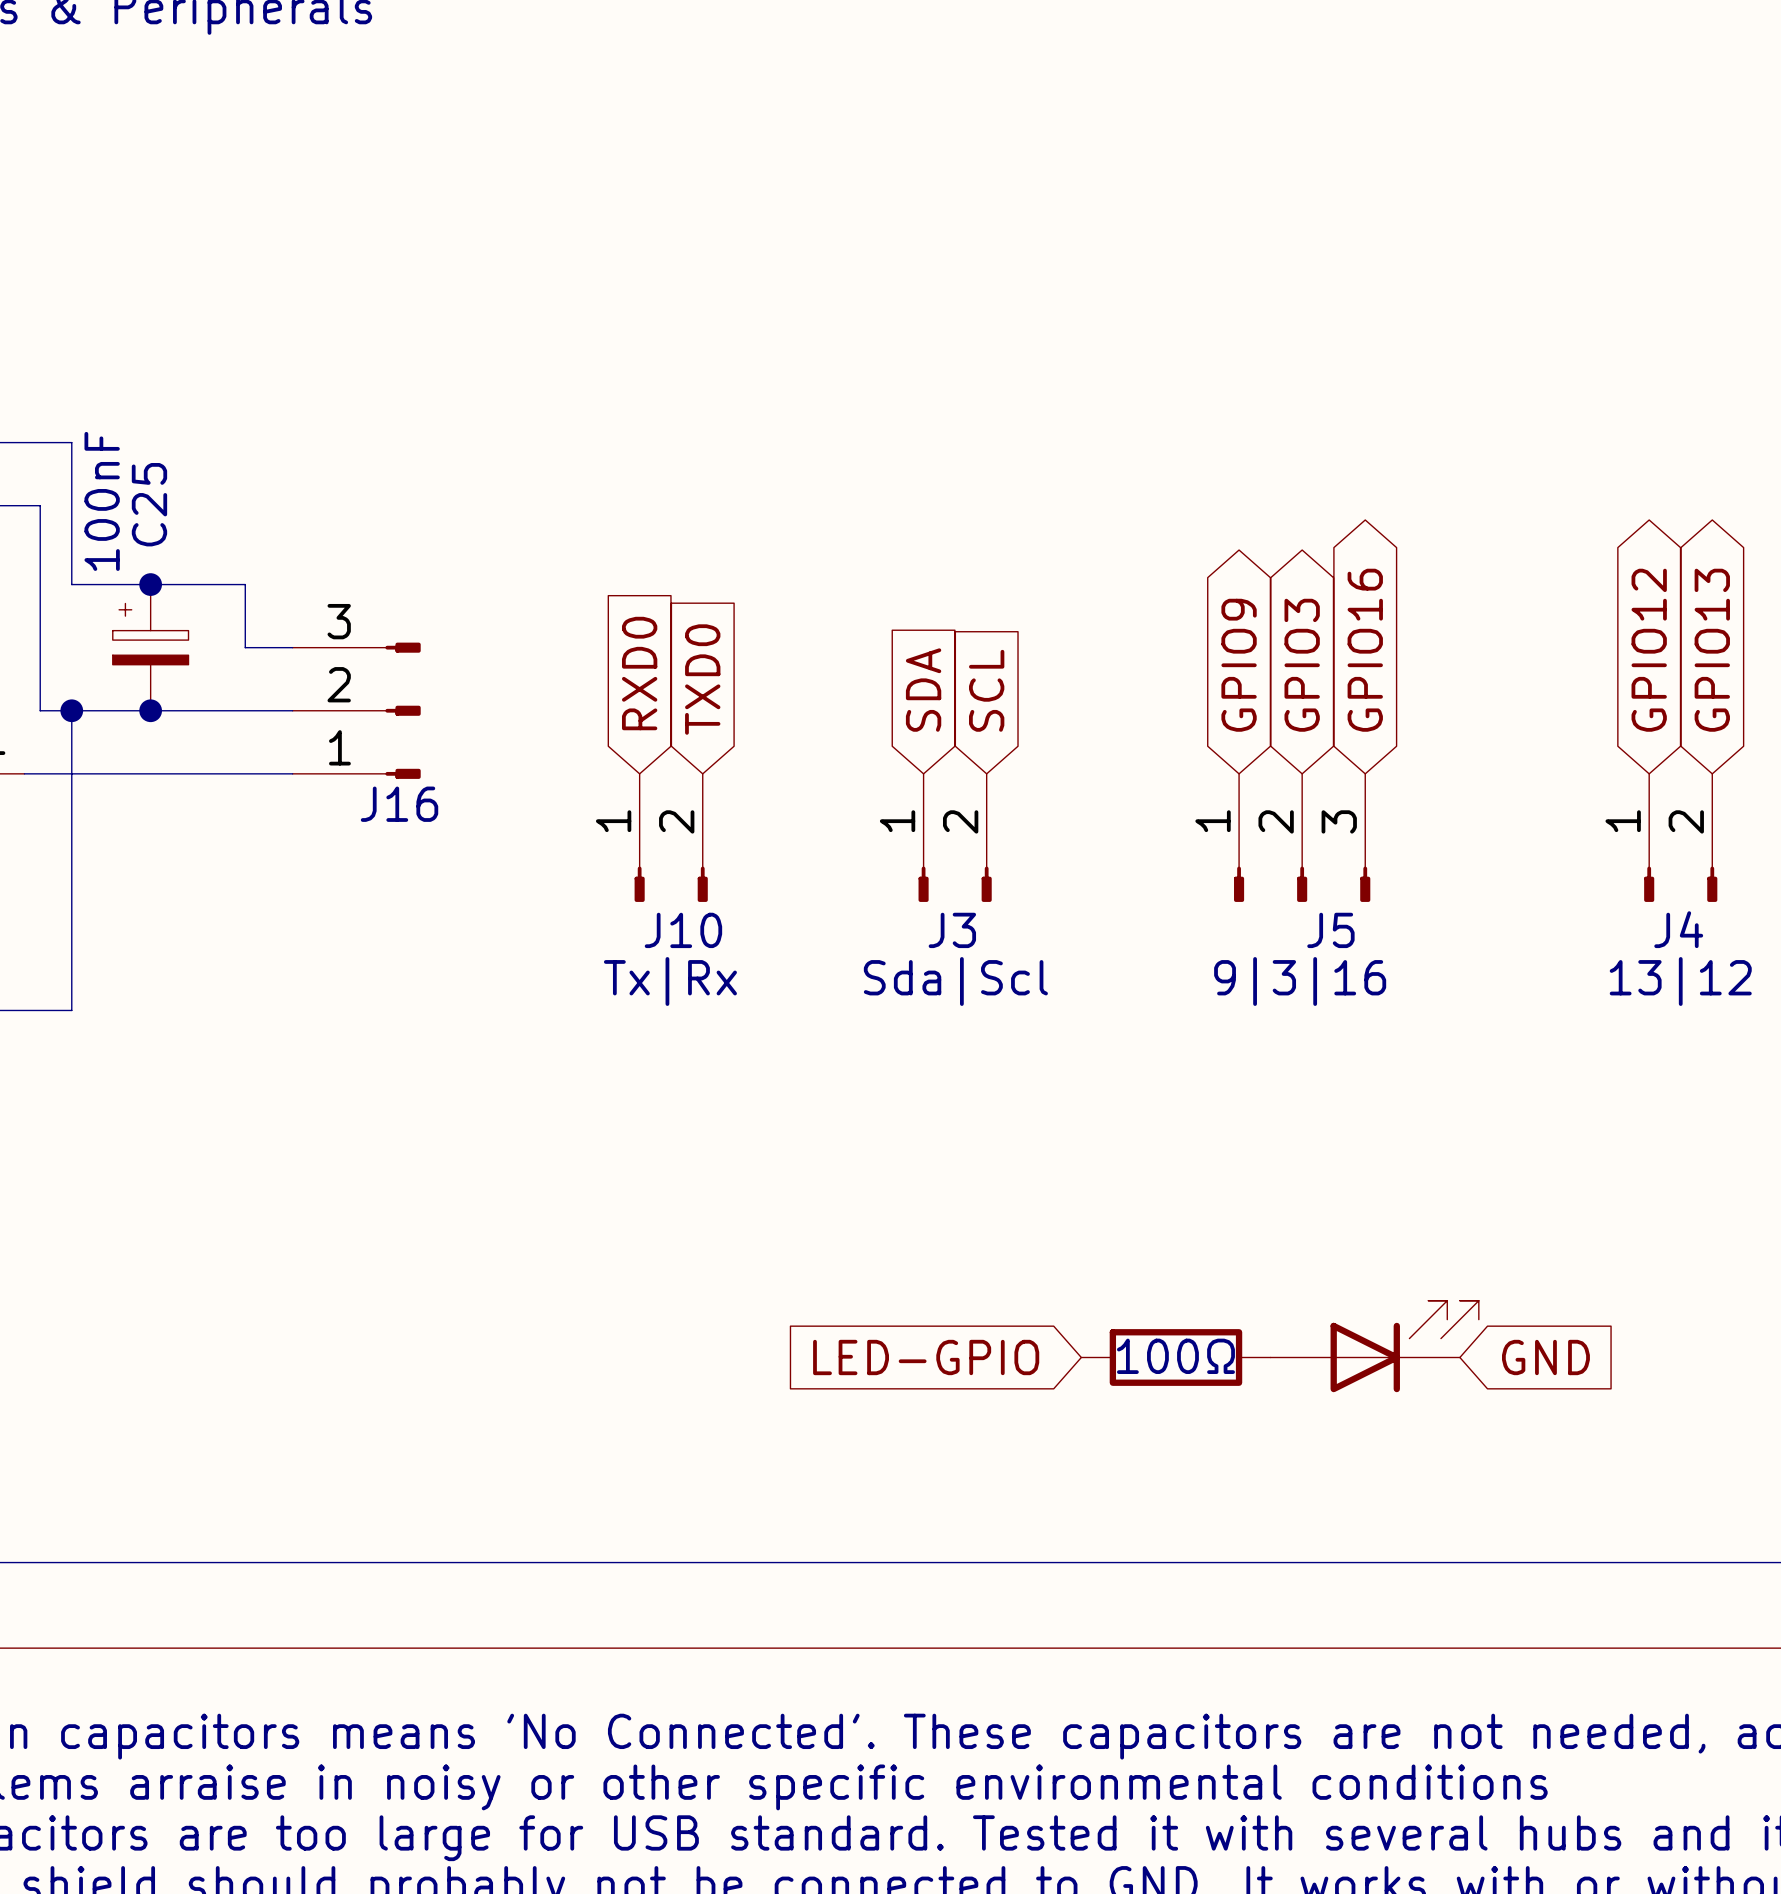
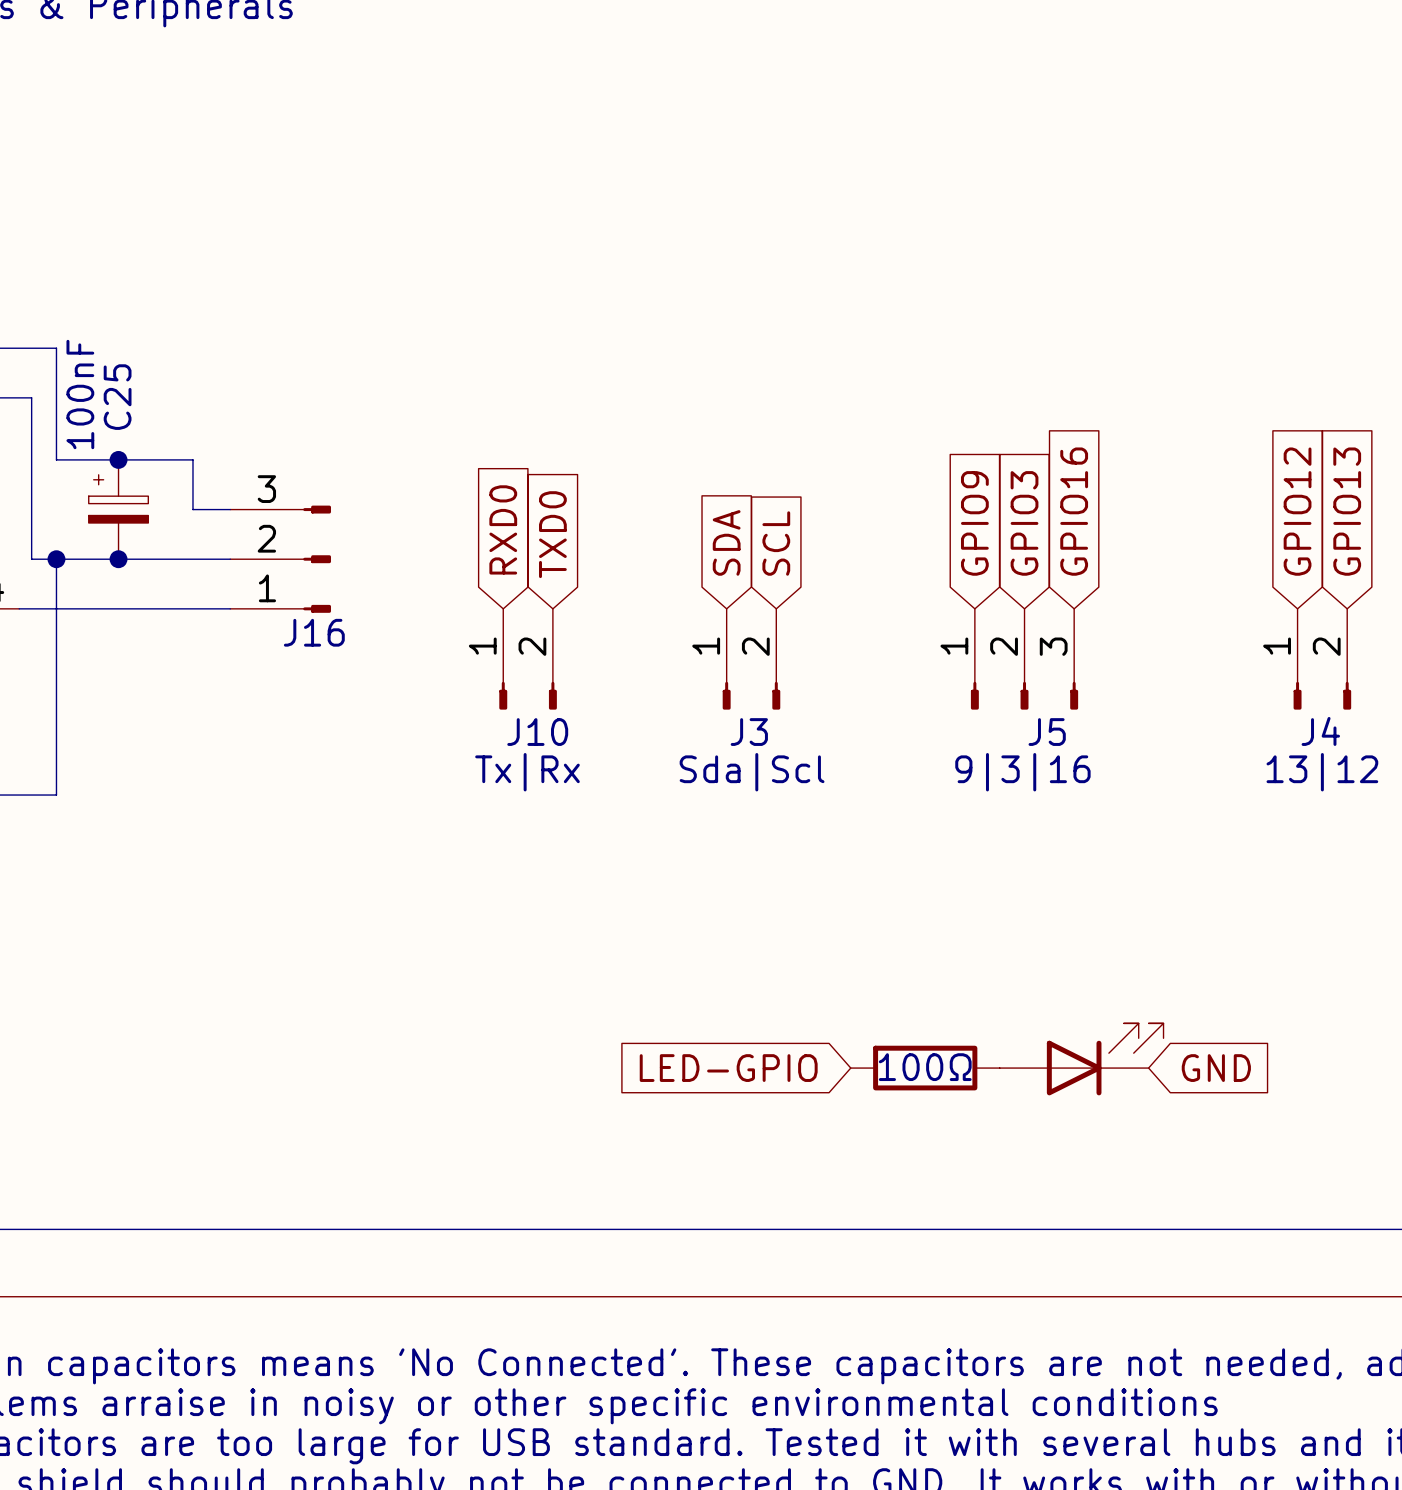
global label shape: bidirectional (1365, 650) -> input (1074, 511)
global label shape: bidirectional (1649, 650) -> input (1297, 511)
global label shape: bidirectional (1712, 650) -> input (1347, 511)
global label shape: bidirectional (1239, 665) -> input (974, 523)
global label shape: bidirectional (1302, 665) -> input (1024, 523)

